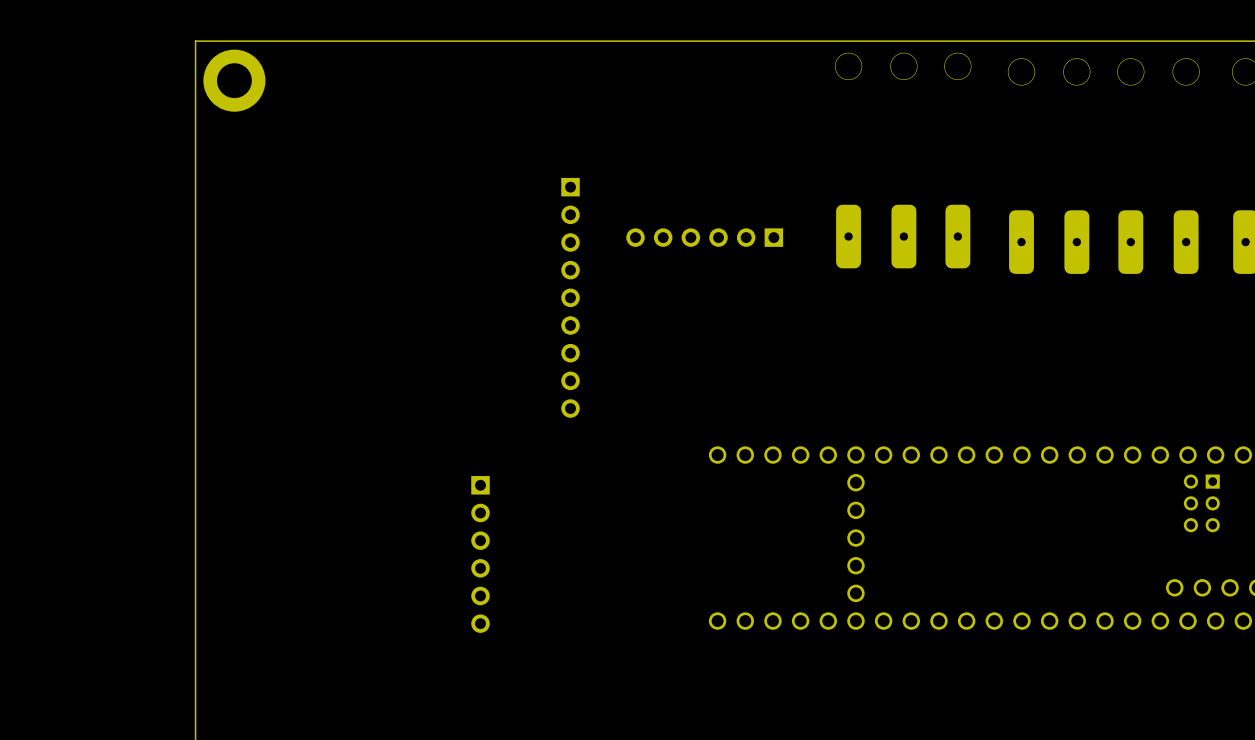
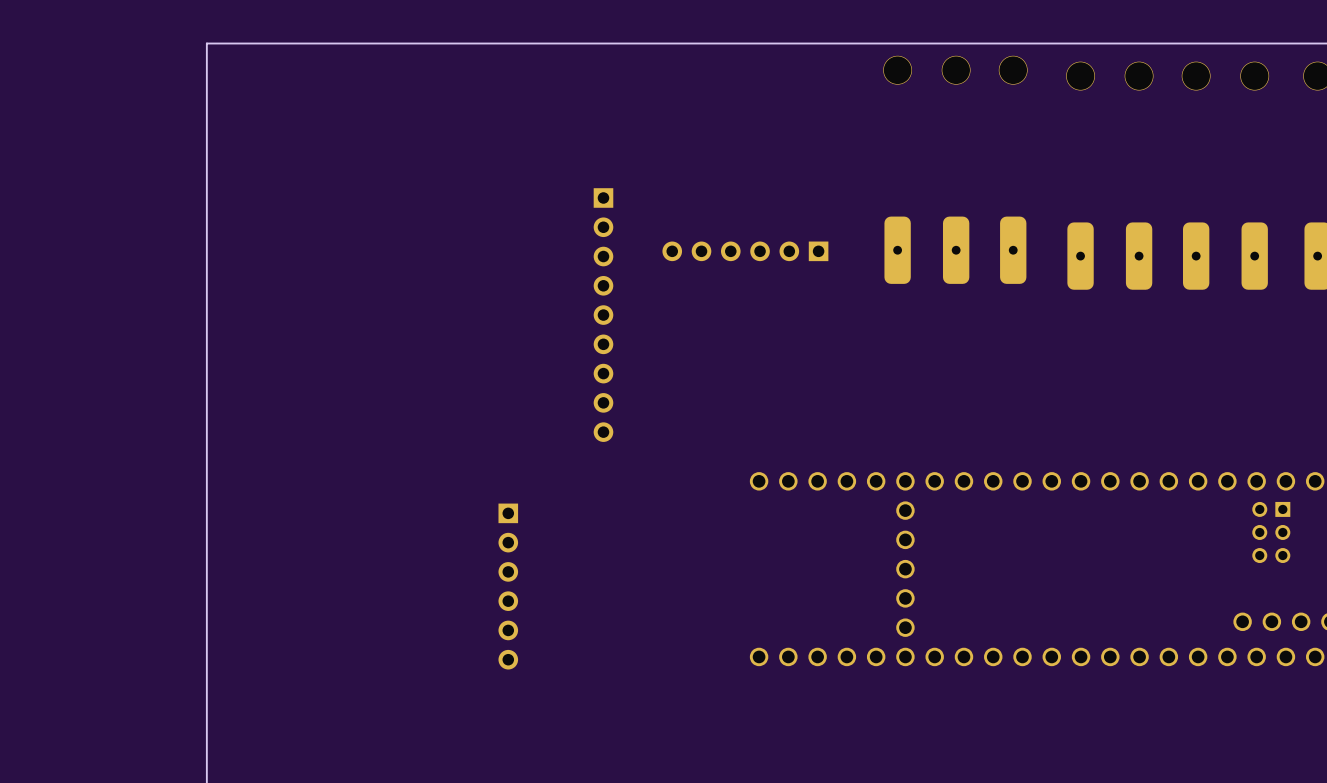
part: (234, 80) -> none

